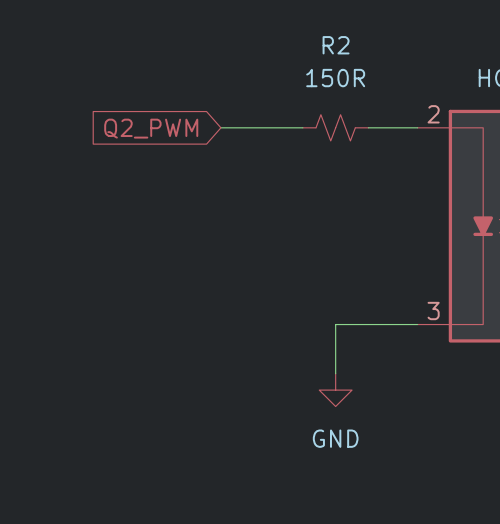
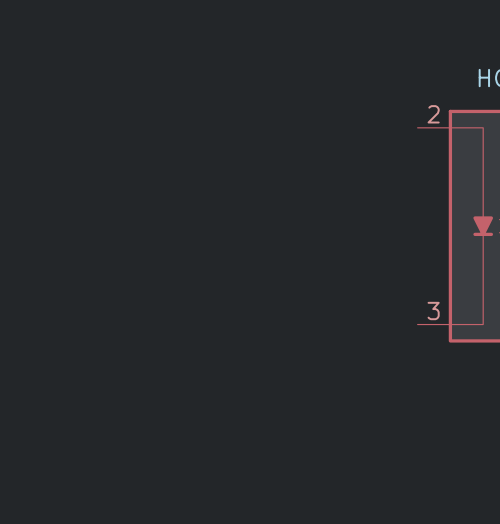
wire: (220, 127) (302, 127) -> none
R2: 150R (335, 127) -> none
wire: (368, 127) (417, 127) -> none
global label: Q2_PWM (151, 128) -> none
wire: (417, 324) (335, 324) (335, 373) -> none
power symbol: GND (335, 390) -> none

